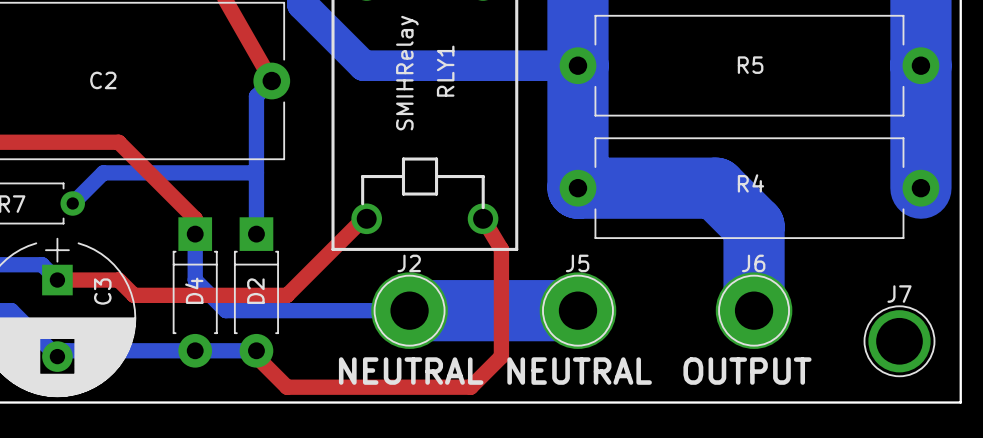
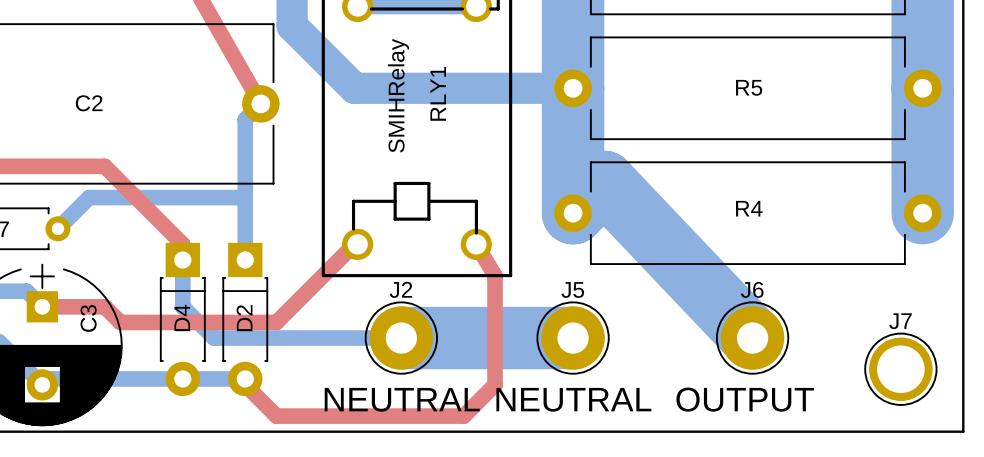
bottom track: (577, 188) (715, 188) (754, 226) (754, 310) -> (573, 213) (604, 181) (752, 338)
J2 footprint: [371, 272, 448, 349] -> [364, 301, 438, 375]
J5 footprint: [539, 272, 617, 349] -> [536, 301, 610, 375]
J6 footprint: [715, 272, 793, 349] -> [715, 301, 790, 375]

